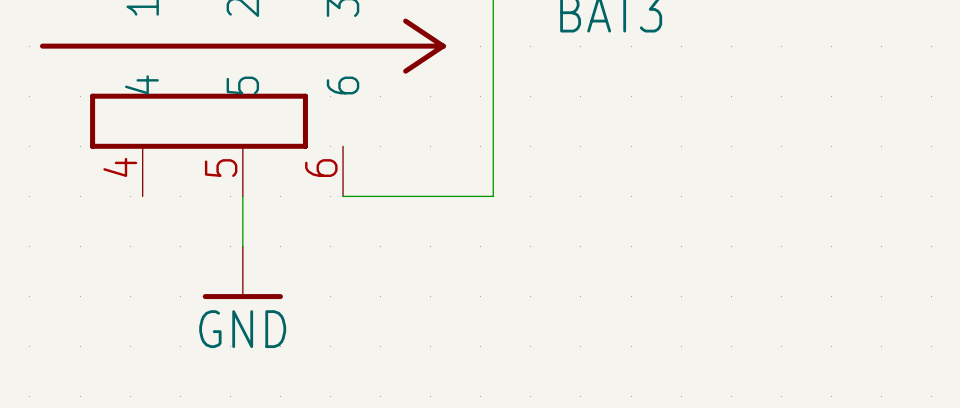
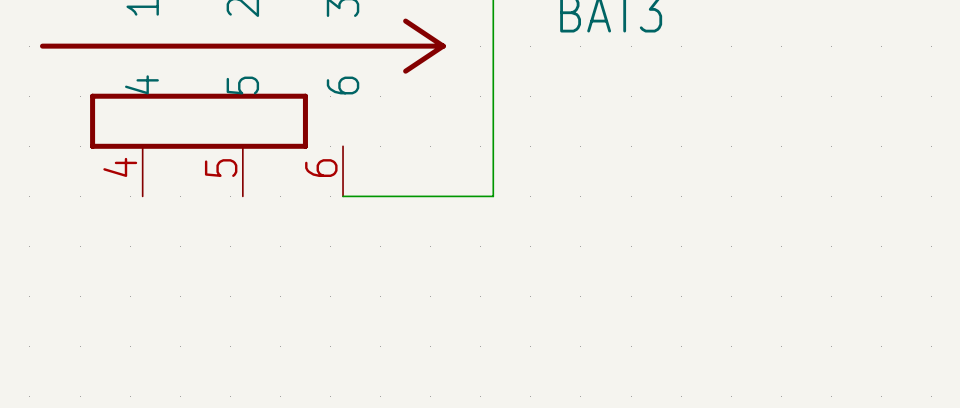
wire: (242, 196) (242, 246) -> none
power symbol: GND (242, 272) -> none

